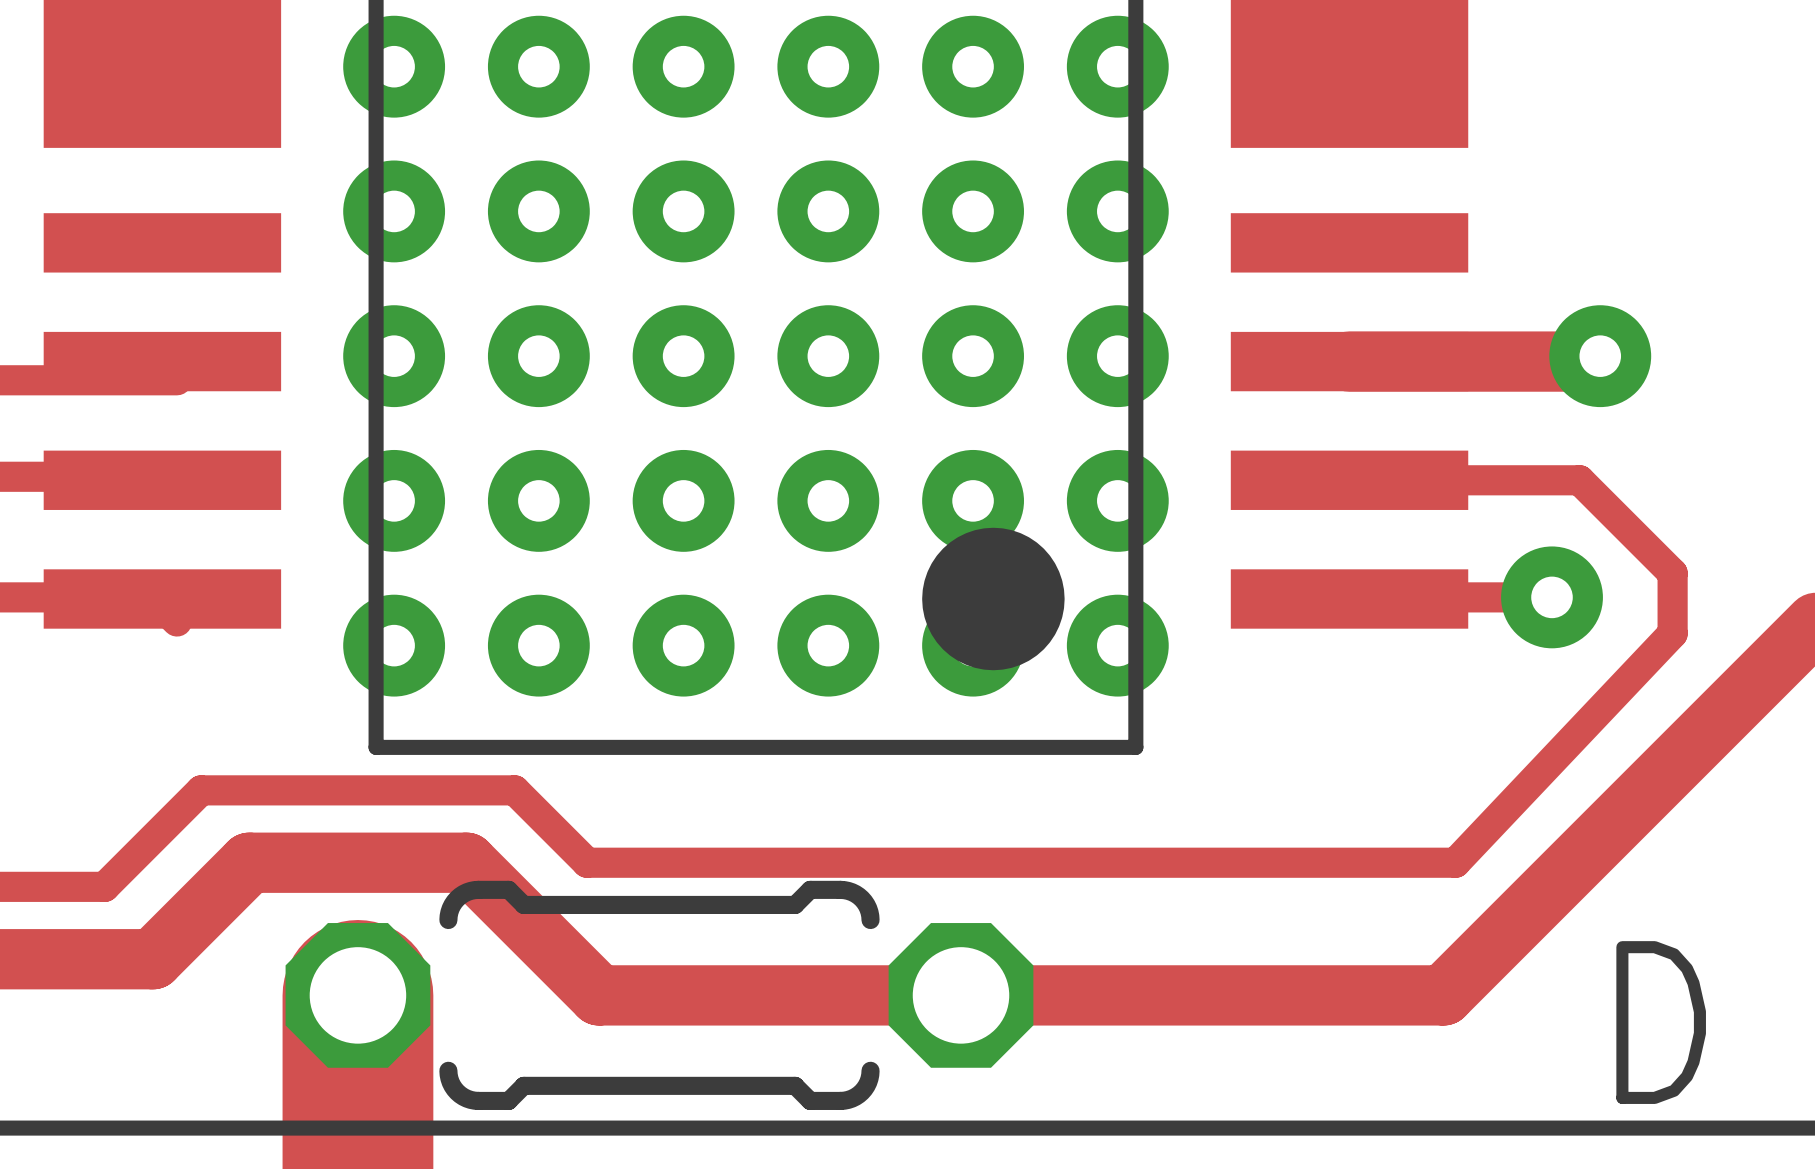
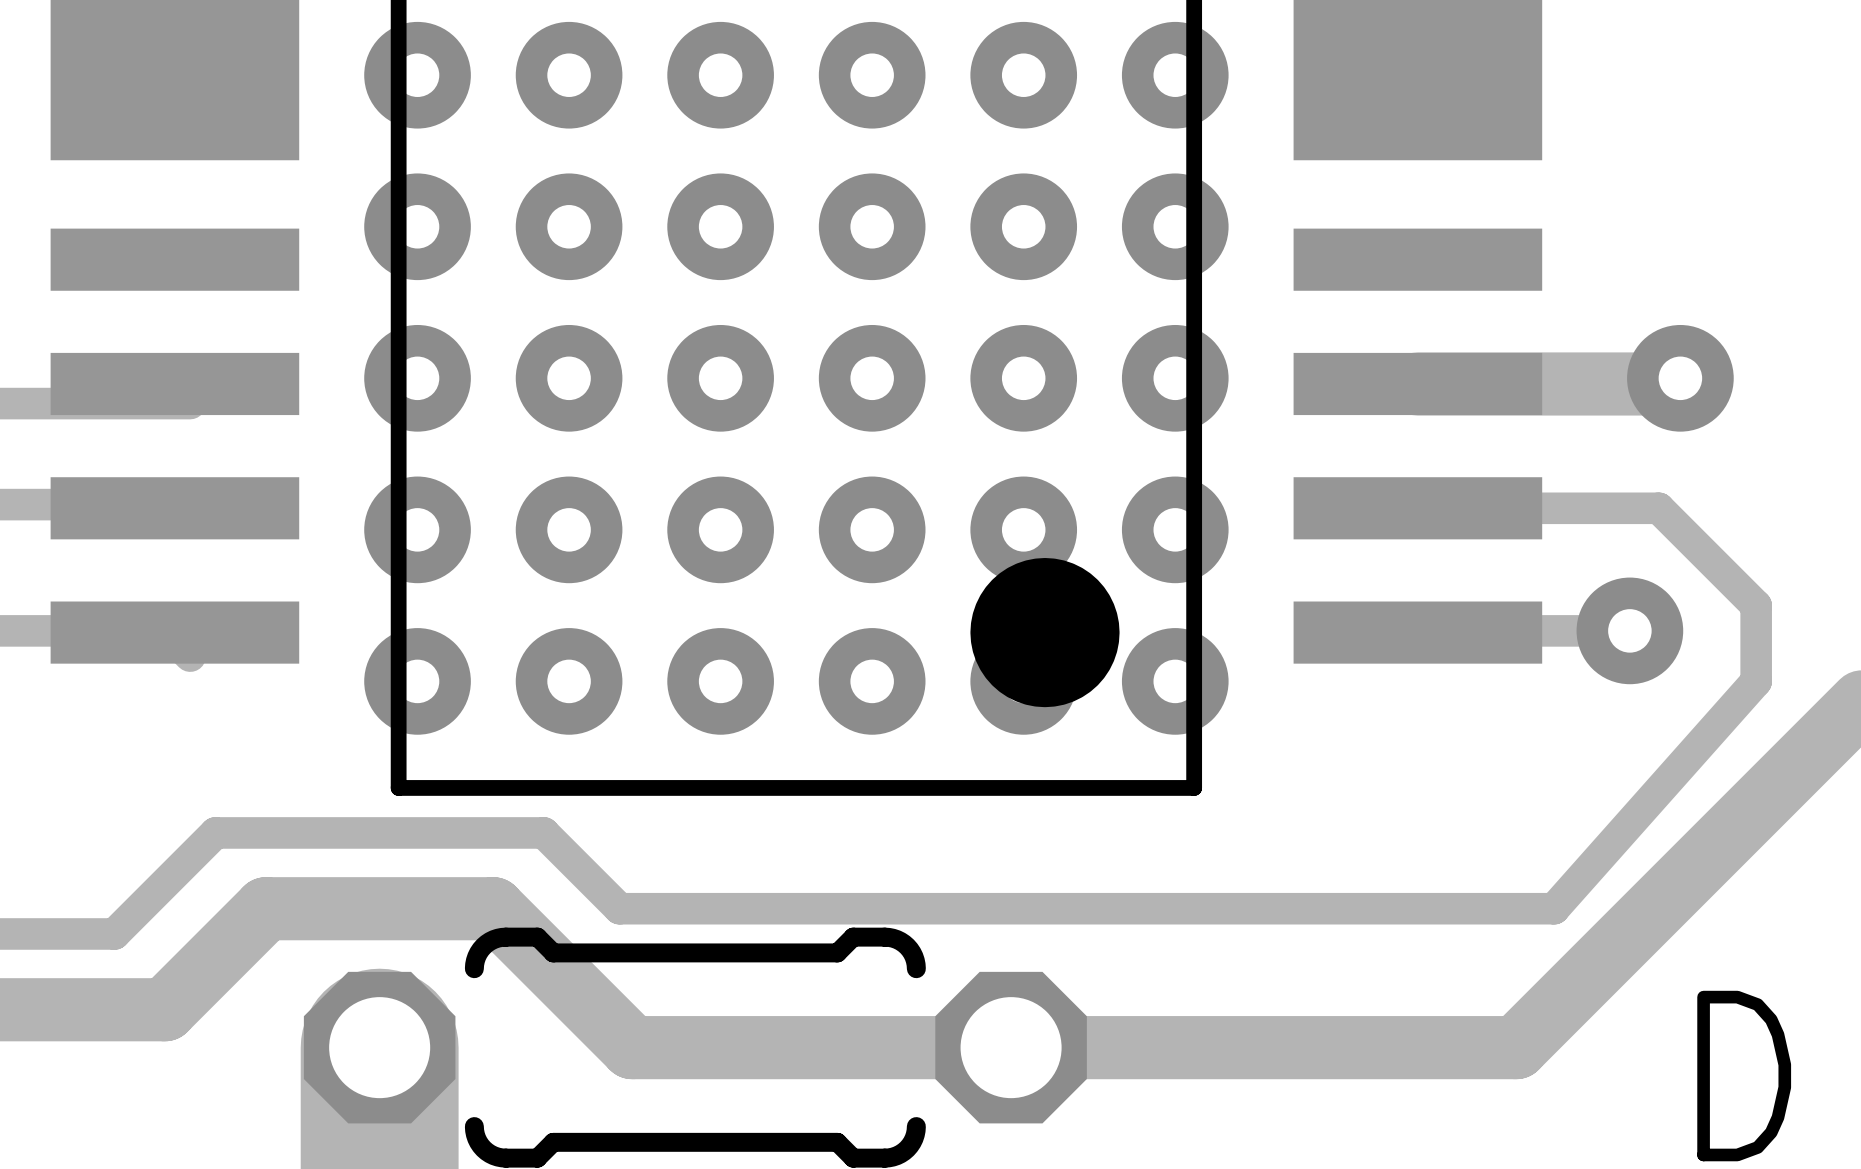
track: (1672, 633) (1455, 862) -> (1756, 668) (1756, 681) (1554, 908) (1528, 908)

